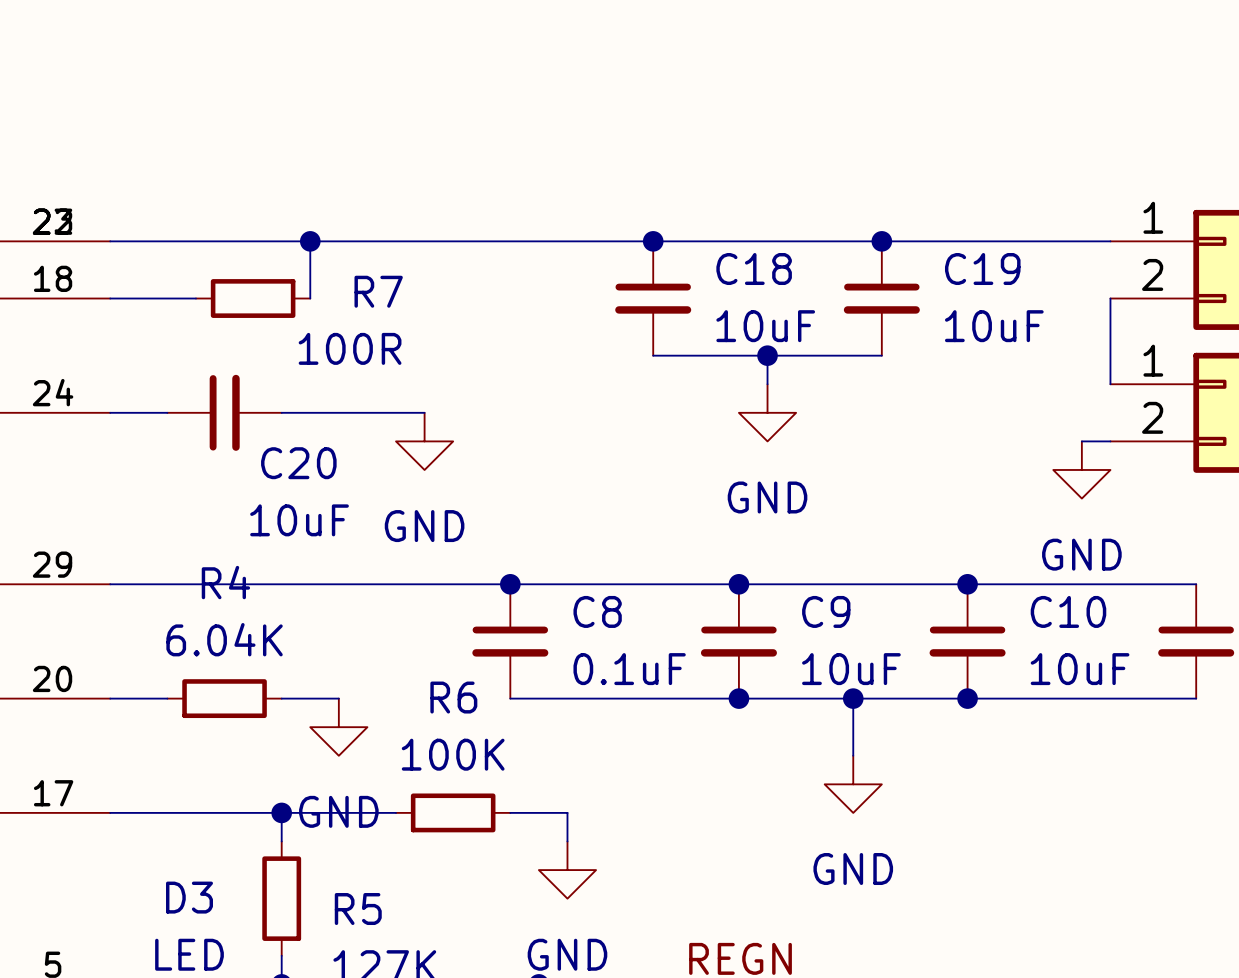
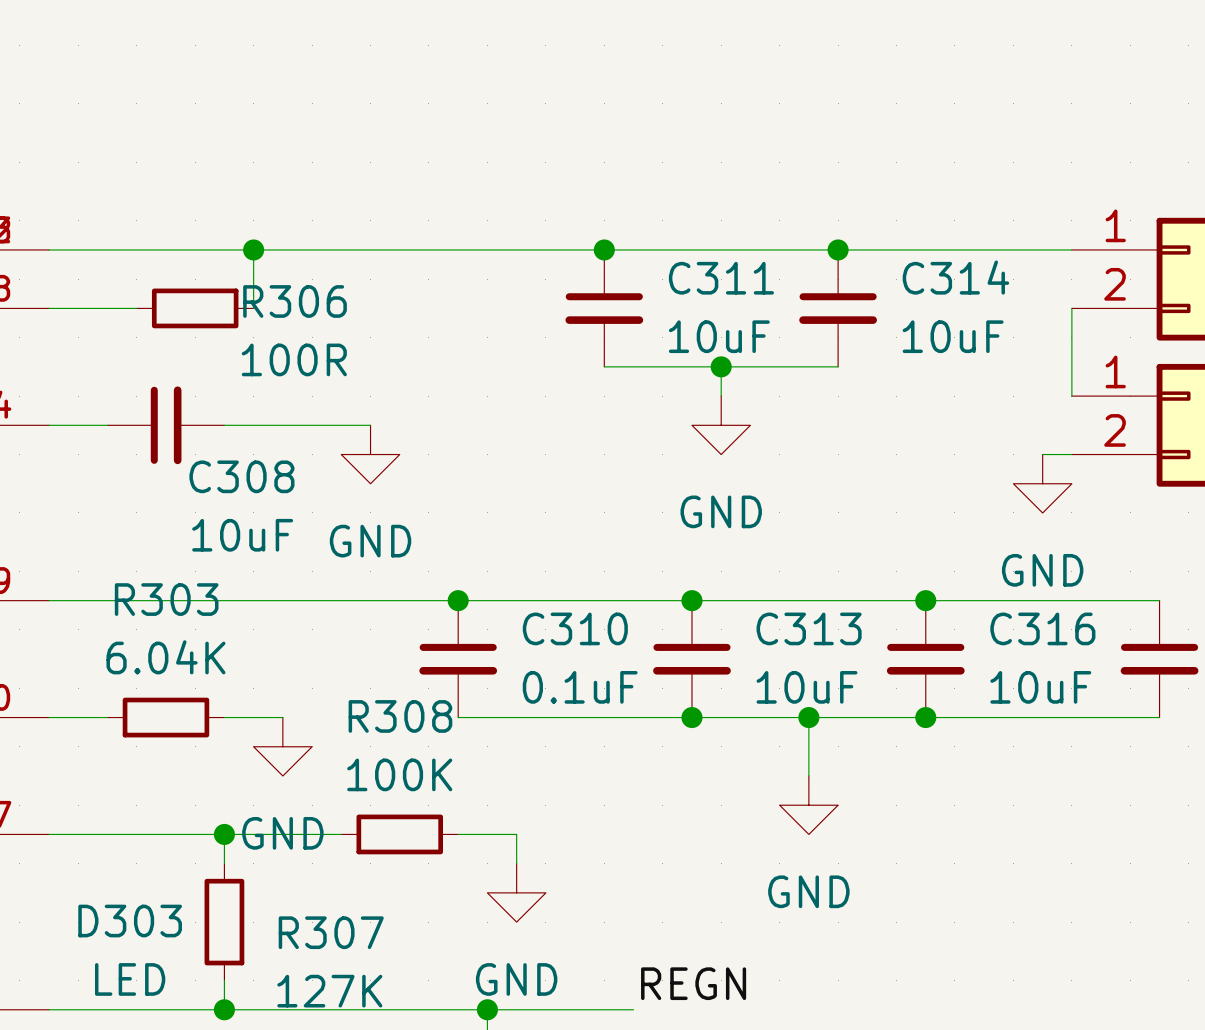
C18 name: C18 (754, 269) -> C311 (721, 278)
C19 name: C19 (982, 269) -> C314 (955, 277)
R7 name: R7 (378, 291) -> R306 (295, 301)
C20 name: C20 (298, 463) -> C308 (241, 476)
R4 name: R4 (225, 582) -> R303 (166, 599)
C8 name: C8 (597, 611) -> C310 (575, 628)
C9 name: C9 (826, 611) -> C313 (809, 628)
C10 name: C10 (1068, 611) -> C316 (1042, 628)
R6 name: R6 (453, 697) -> R308 (400, 716)
D3 name: D3 (189, 897) -> D303 (130, 921)
R5 name: R5 (358, 909) -> R307 (331, 932)

